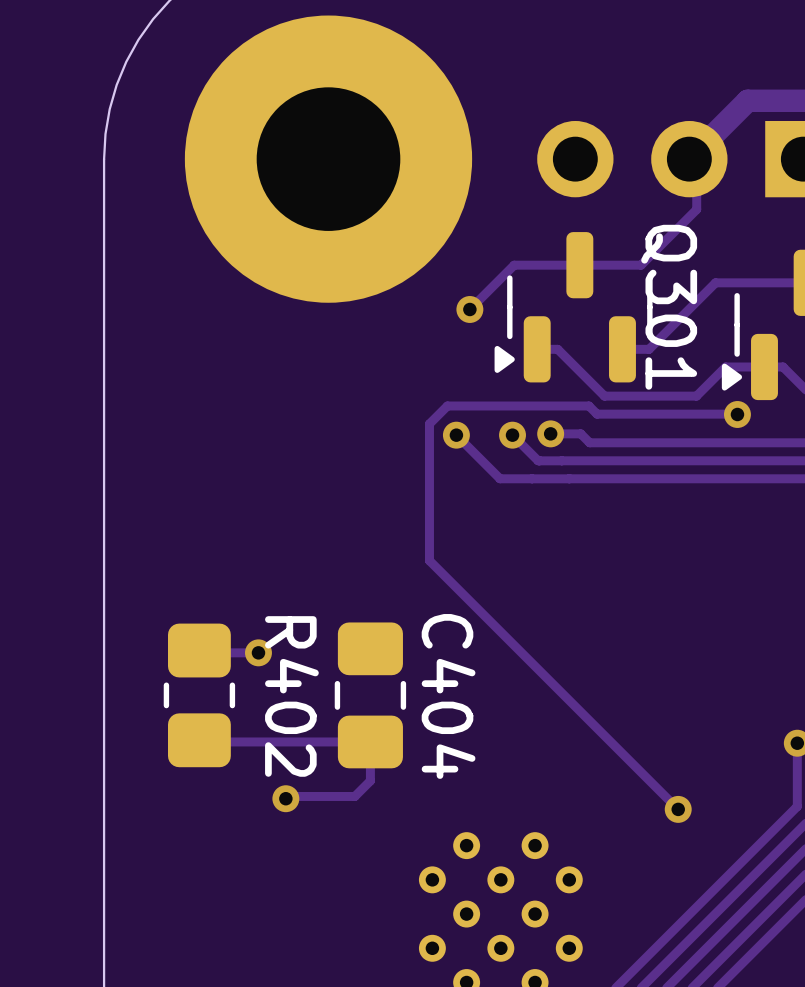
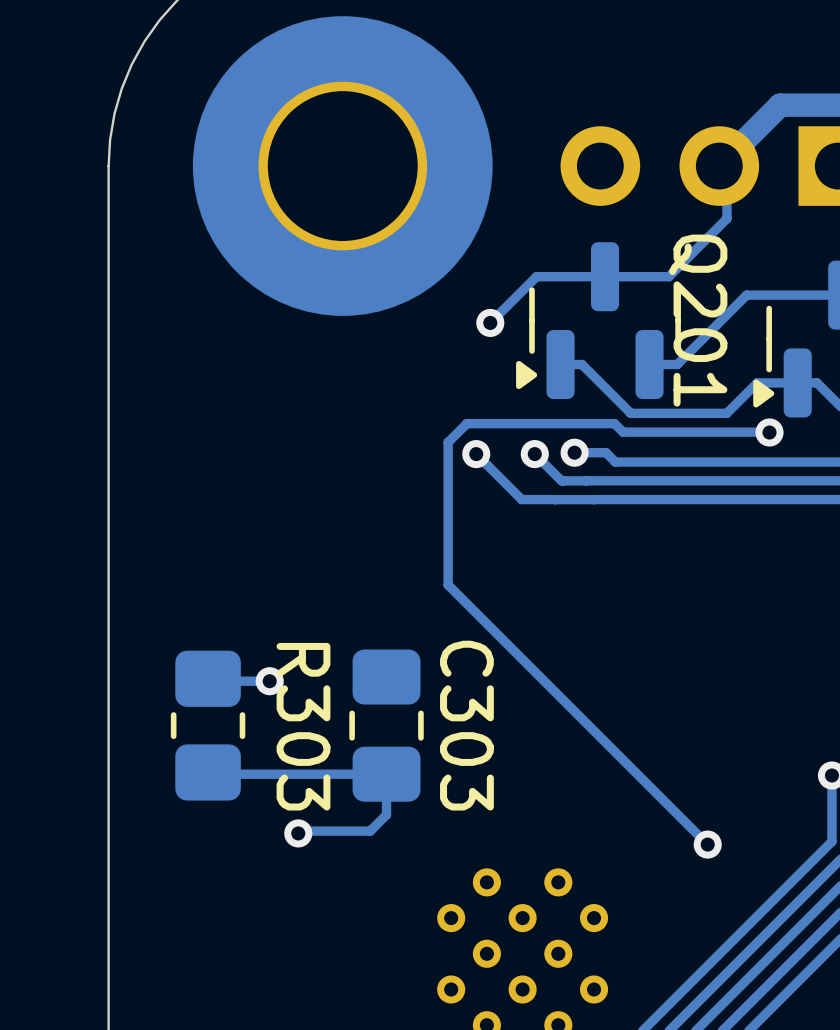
Q301 name: Q301 (669, 307) -> Q201 (698, 320)
R402 name: R402 (291, 696) -> R303 (303, 726)
C404 name: C404 (448, 696) -> C303 (466, 725)

